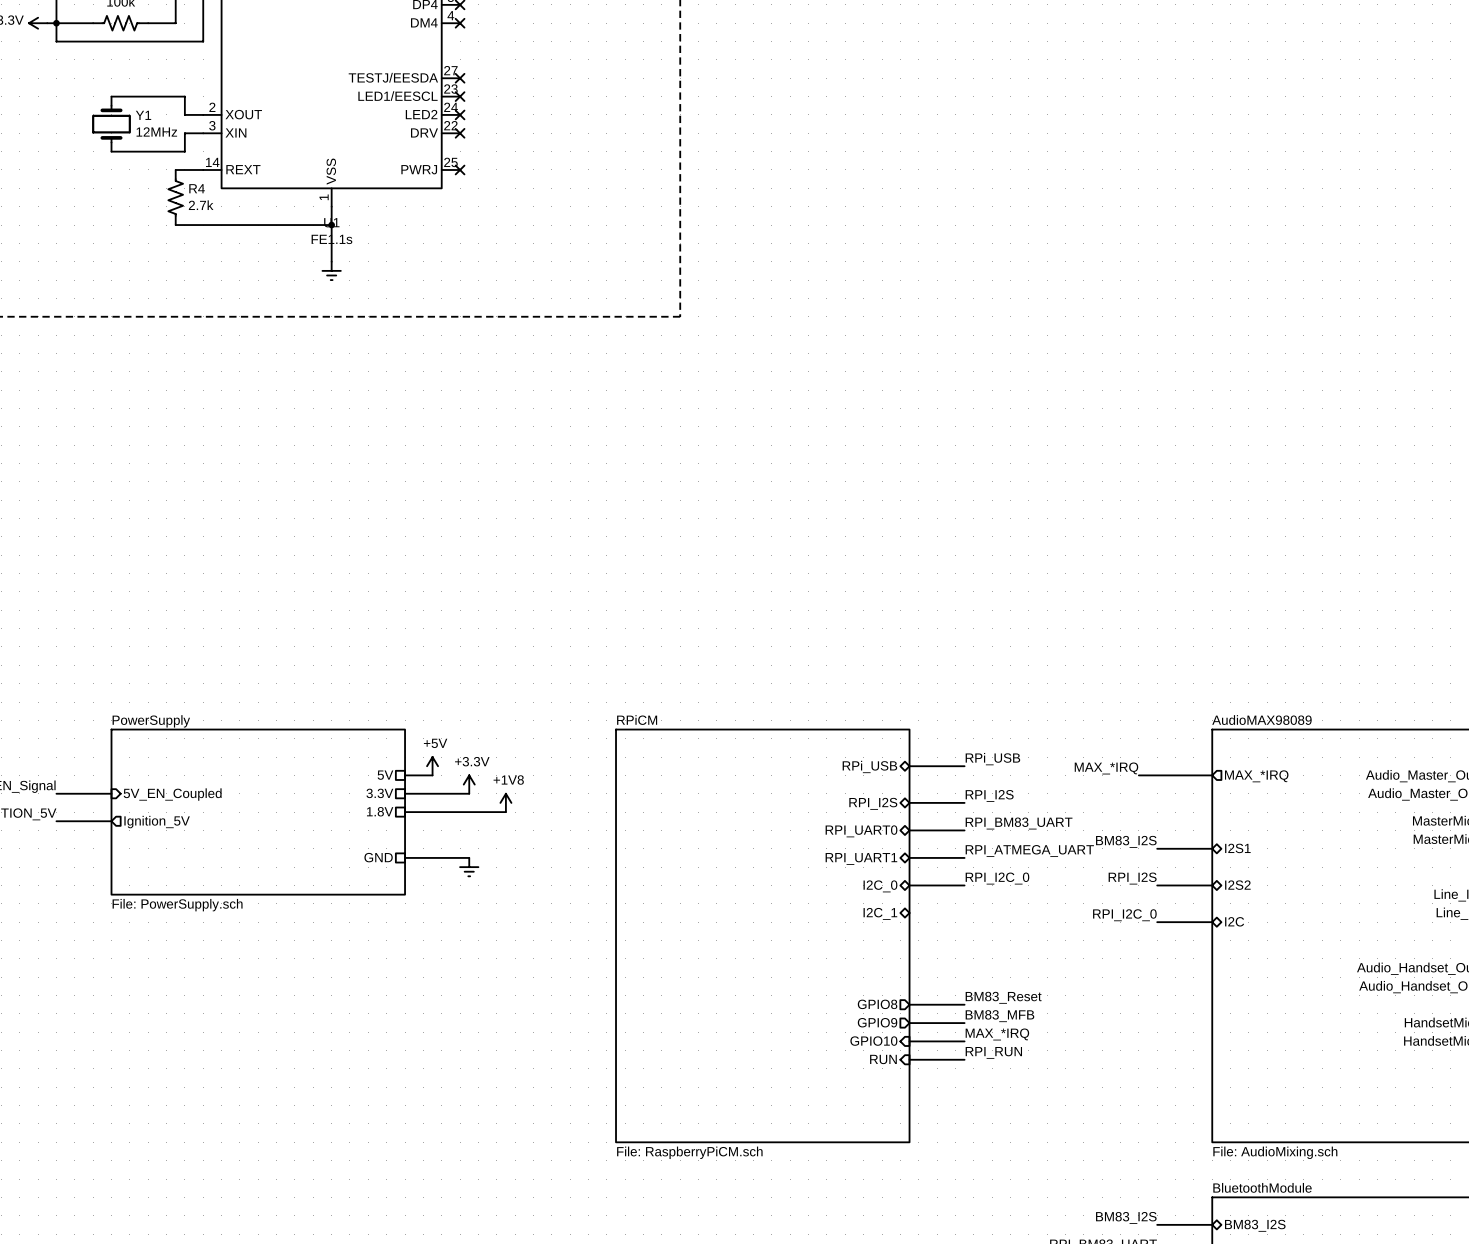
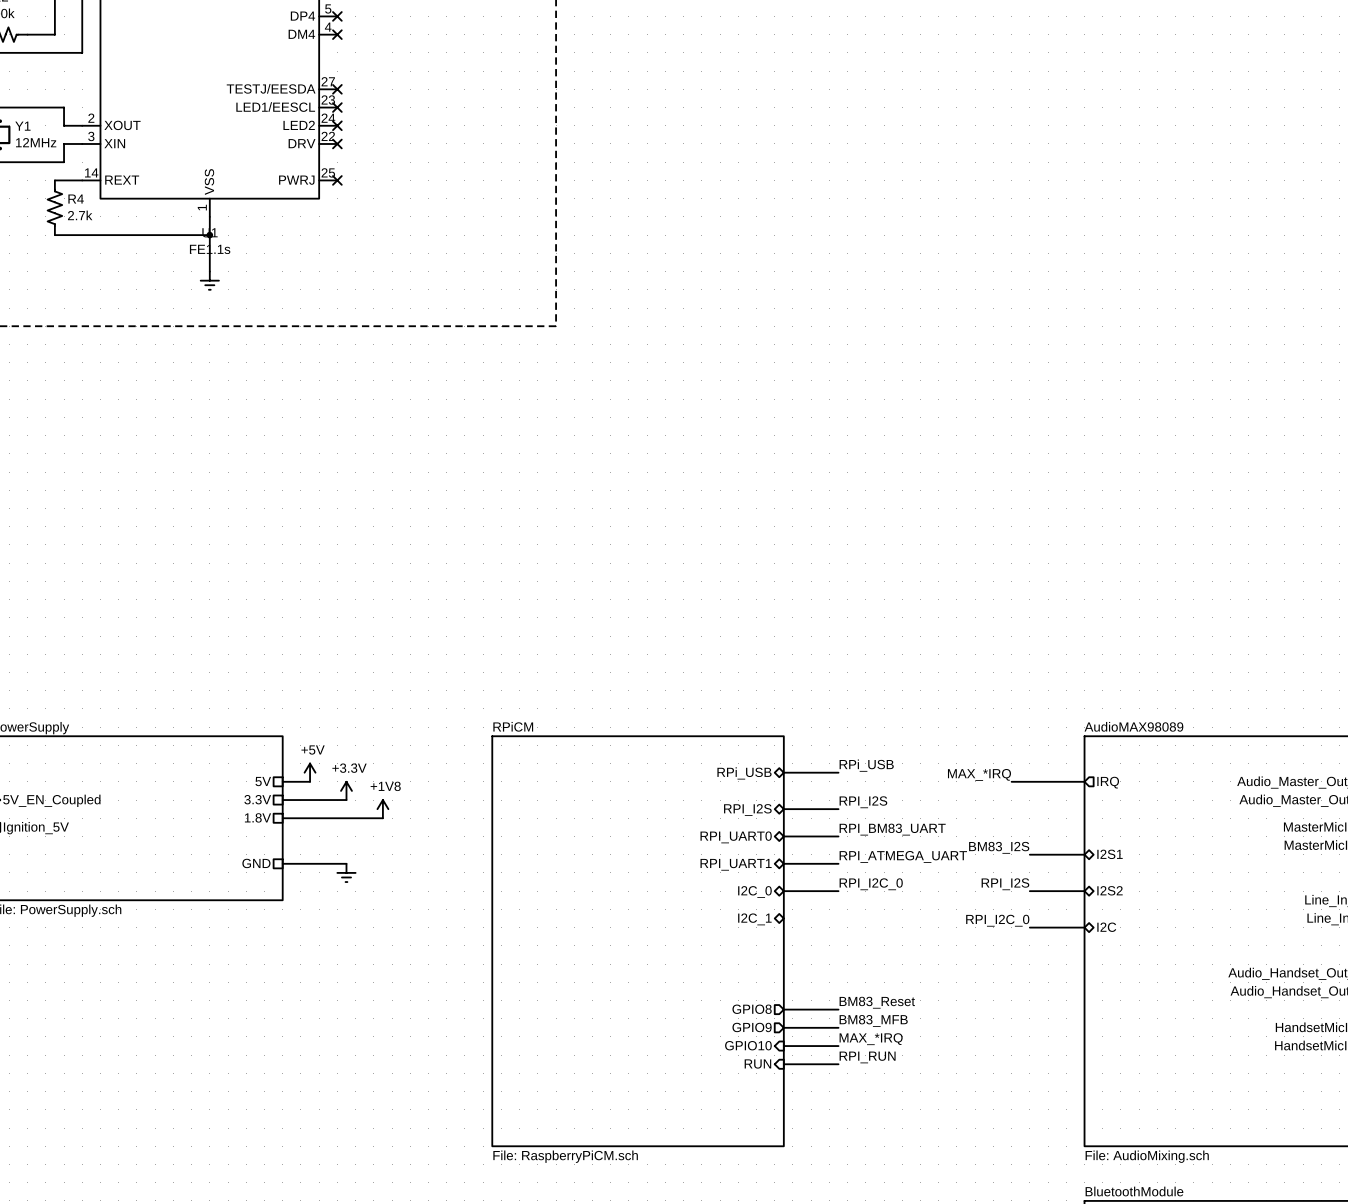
sheet pin: MAX_*IRQ (1256, 776) -> IRQ (1108, 782)

